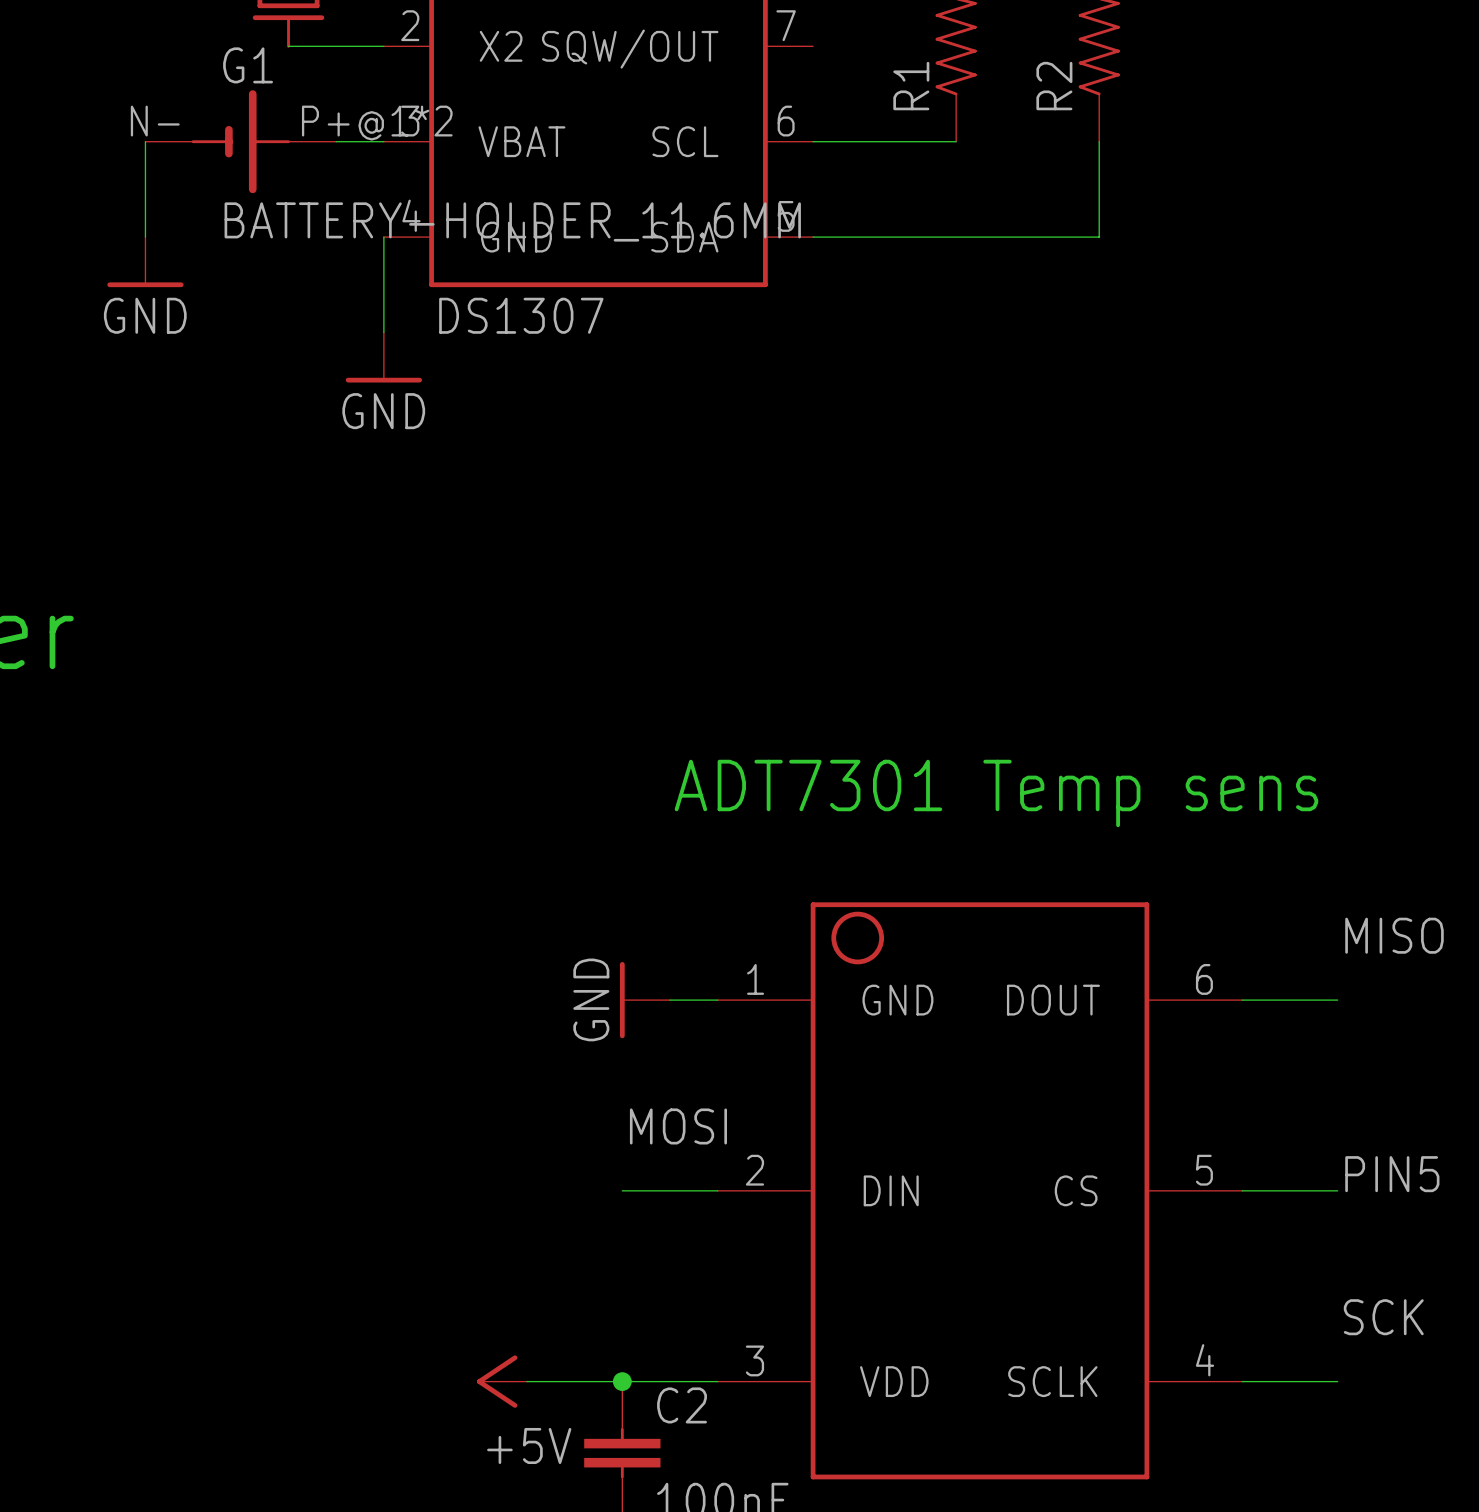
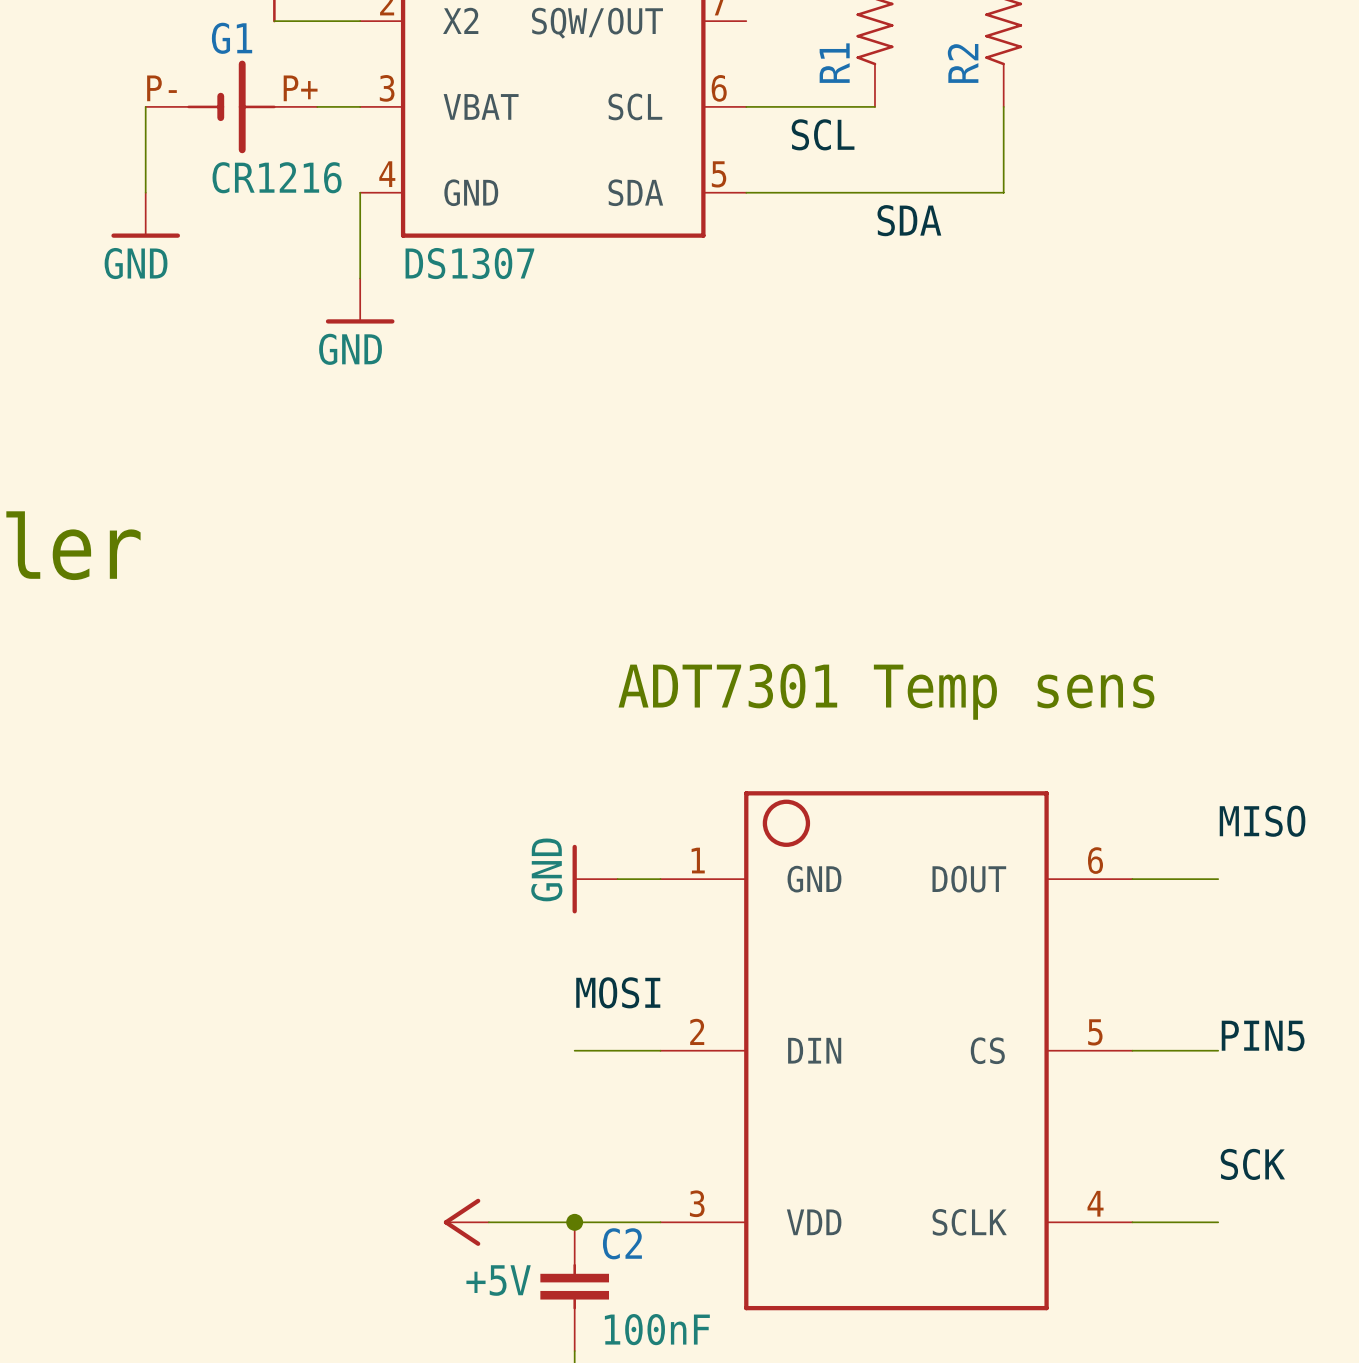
G1 pin number: N- (155, 121) -> P- (161, 88)
G1 pin number: P+@1*2 (377, 123) -> P+ (300, 88)
label: none -> SCL (823, 134)
G1 value: BATTERY-HOLDER_11.6MM (512, 221) -> CR1216 (277, 177)
label: none -> SDA (909, 220)

